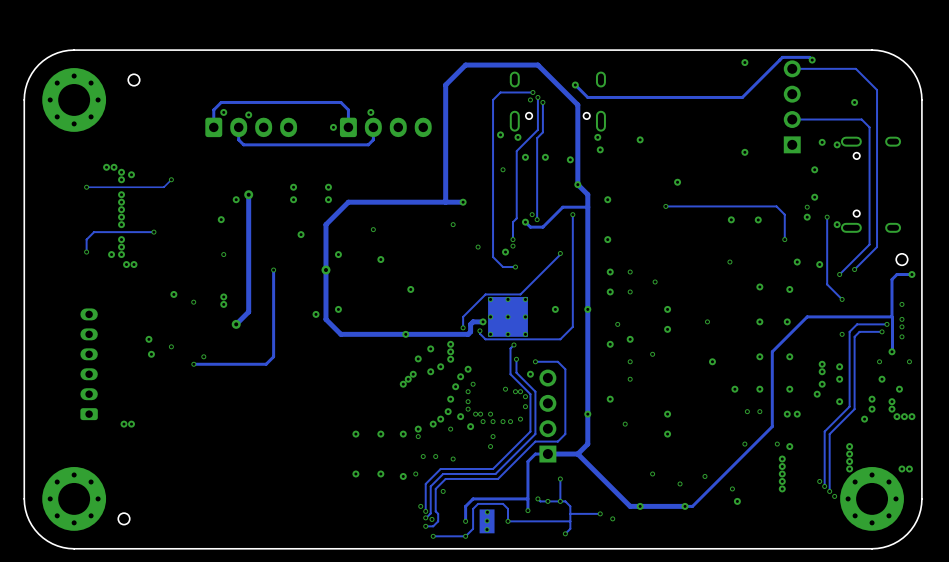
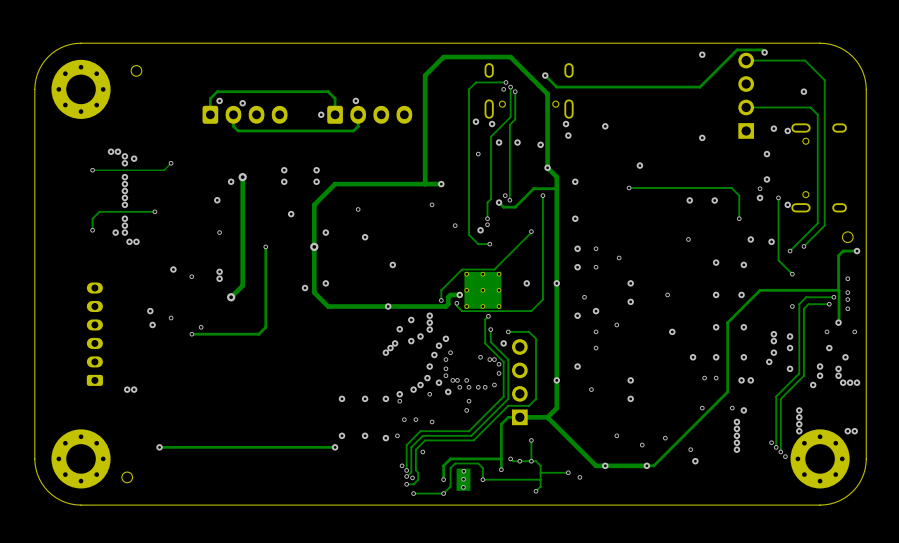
via: none -> (159, 447)
track: none -> (335, 447) (159, 447)
via: none -> (335, 447)

